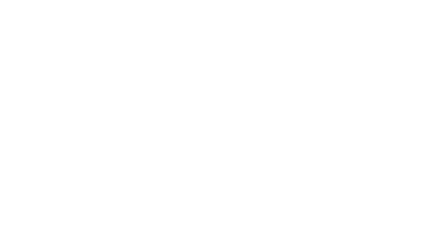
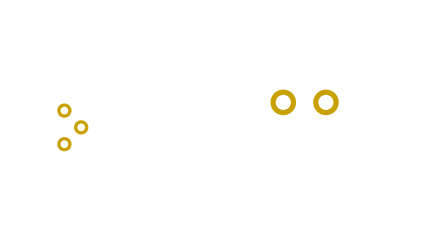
part: none -> (304, 102)
part: none -> (72, 127)

